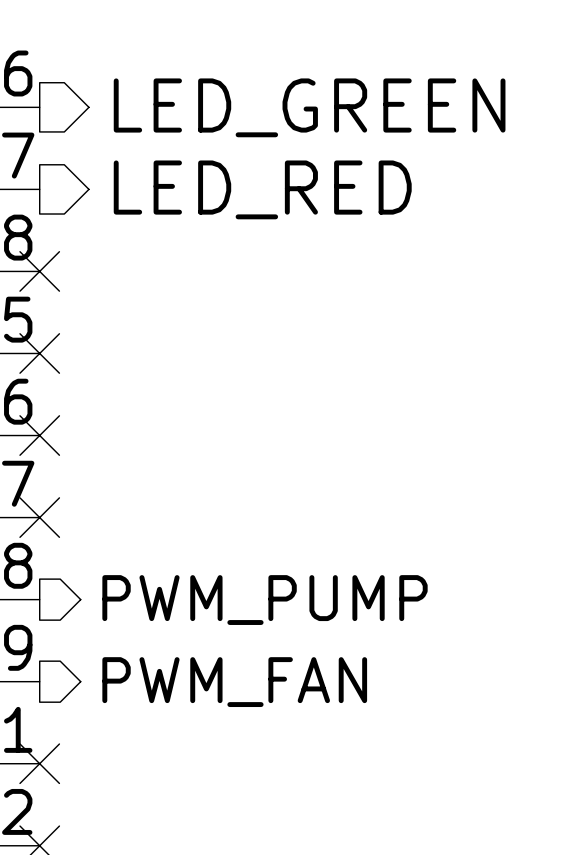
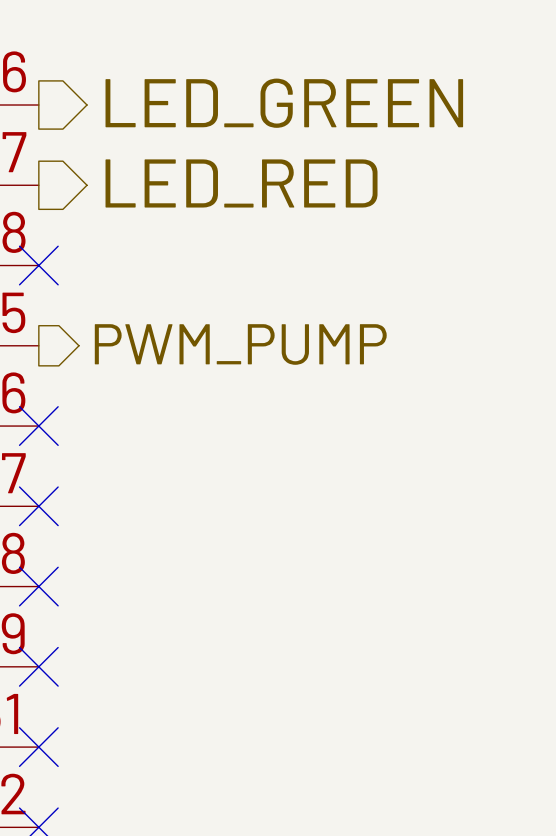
no-connect mark: (39, 353) -> none
no-connect mark: none -> (38, 586)
hierarchical label position: PWM_PUMP (265, 600) -> PWM_PUMP (240, 344)
no-connect mark: none -> (38, 666)
hierarchical label: PWM_FAN (234, 682) -> none

